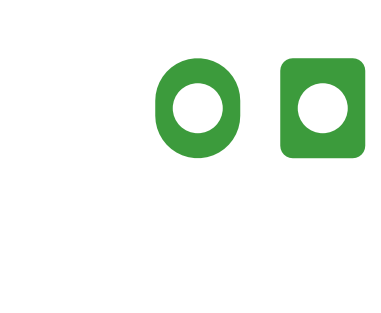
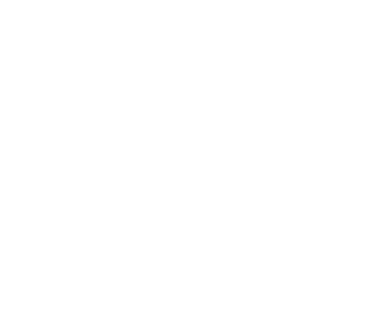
part: (260, 108) -> none

